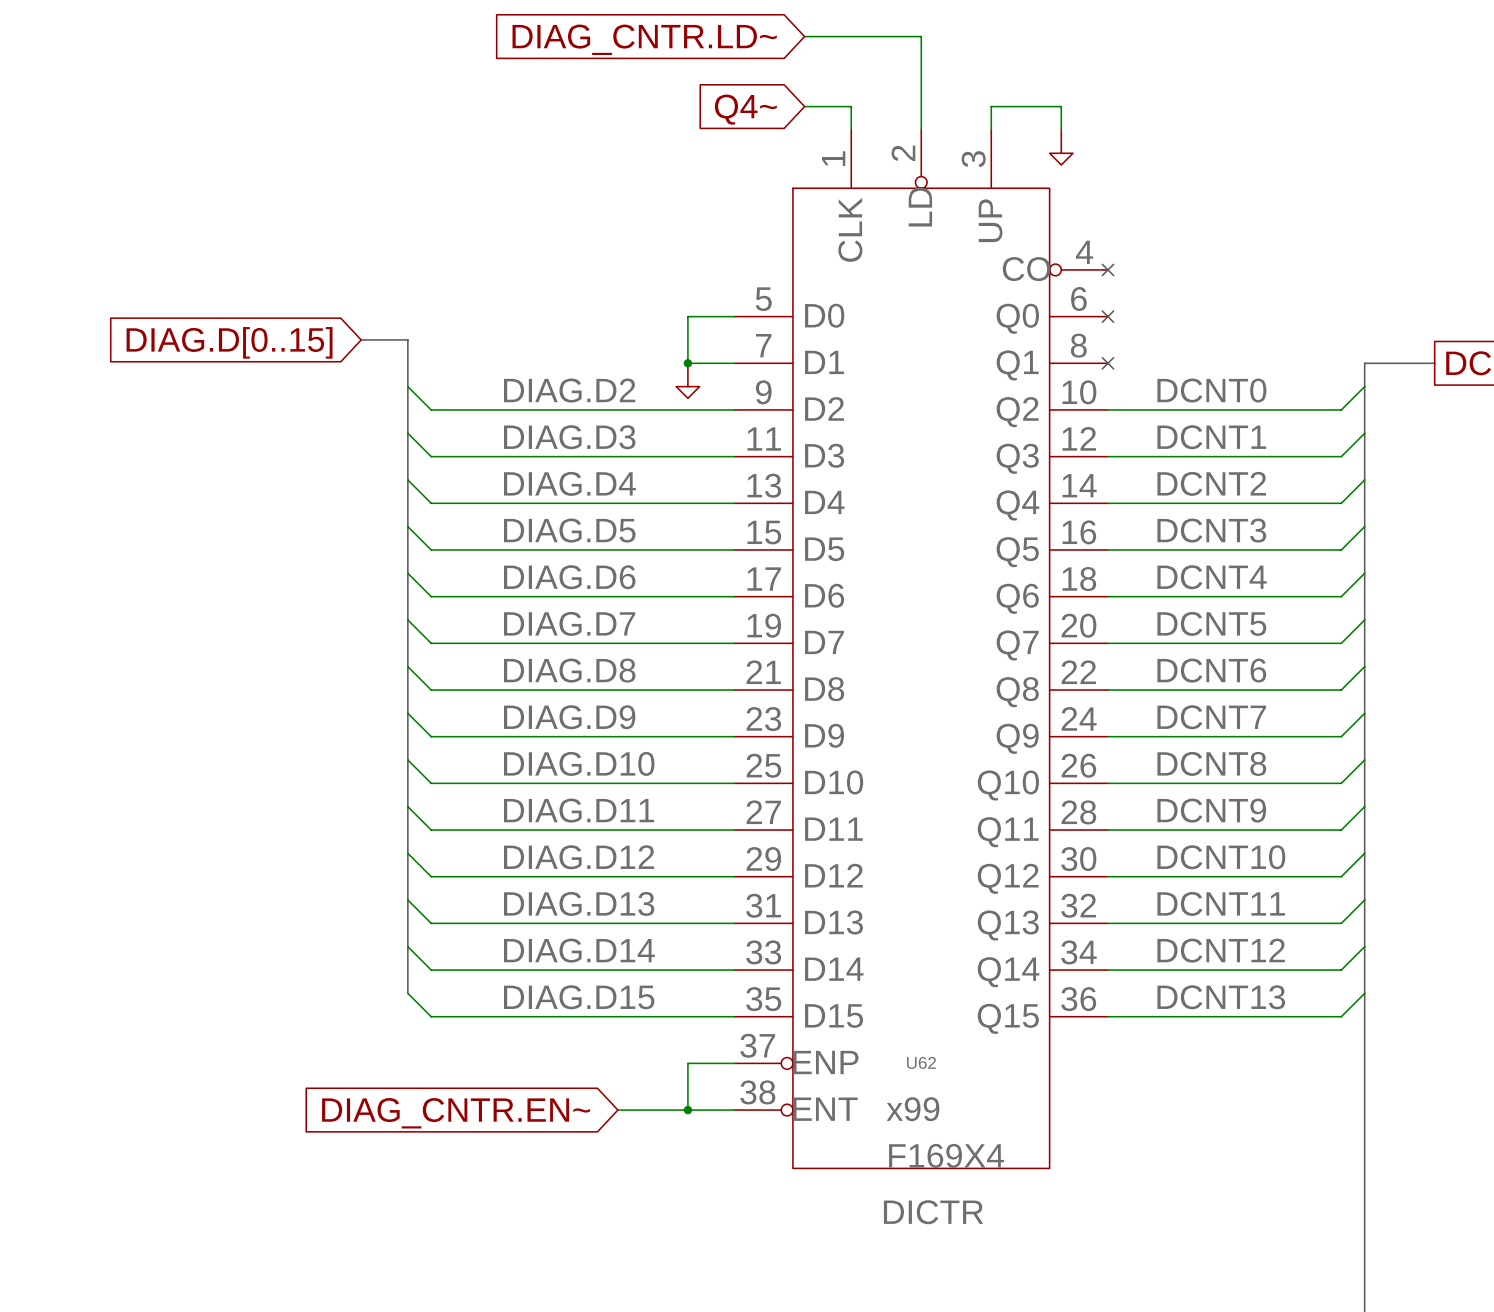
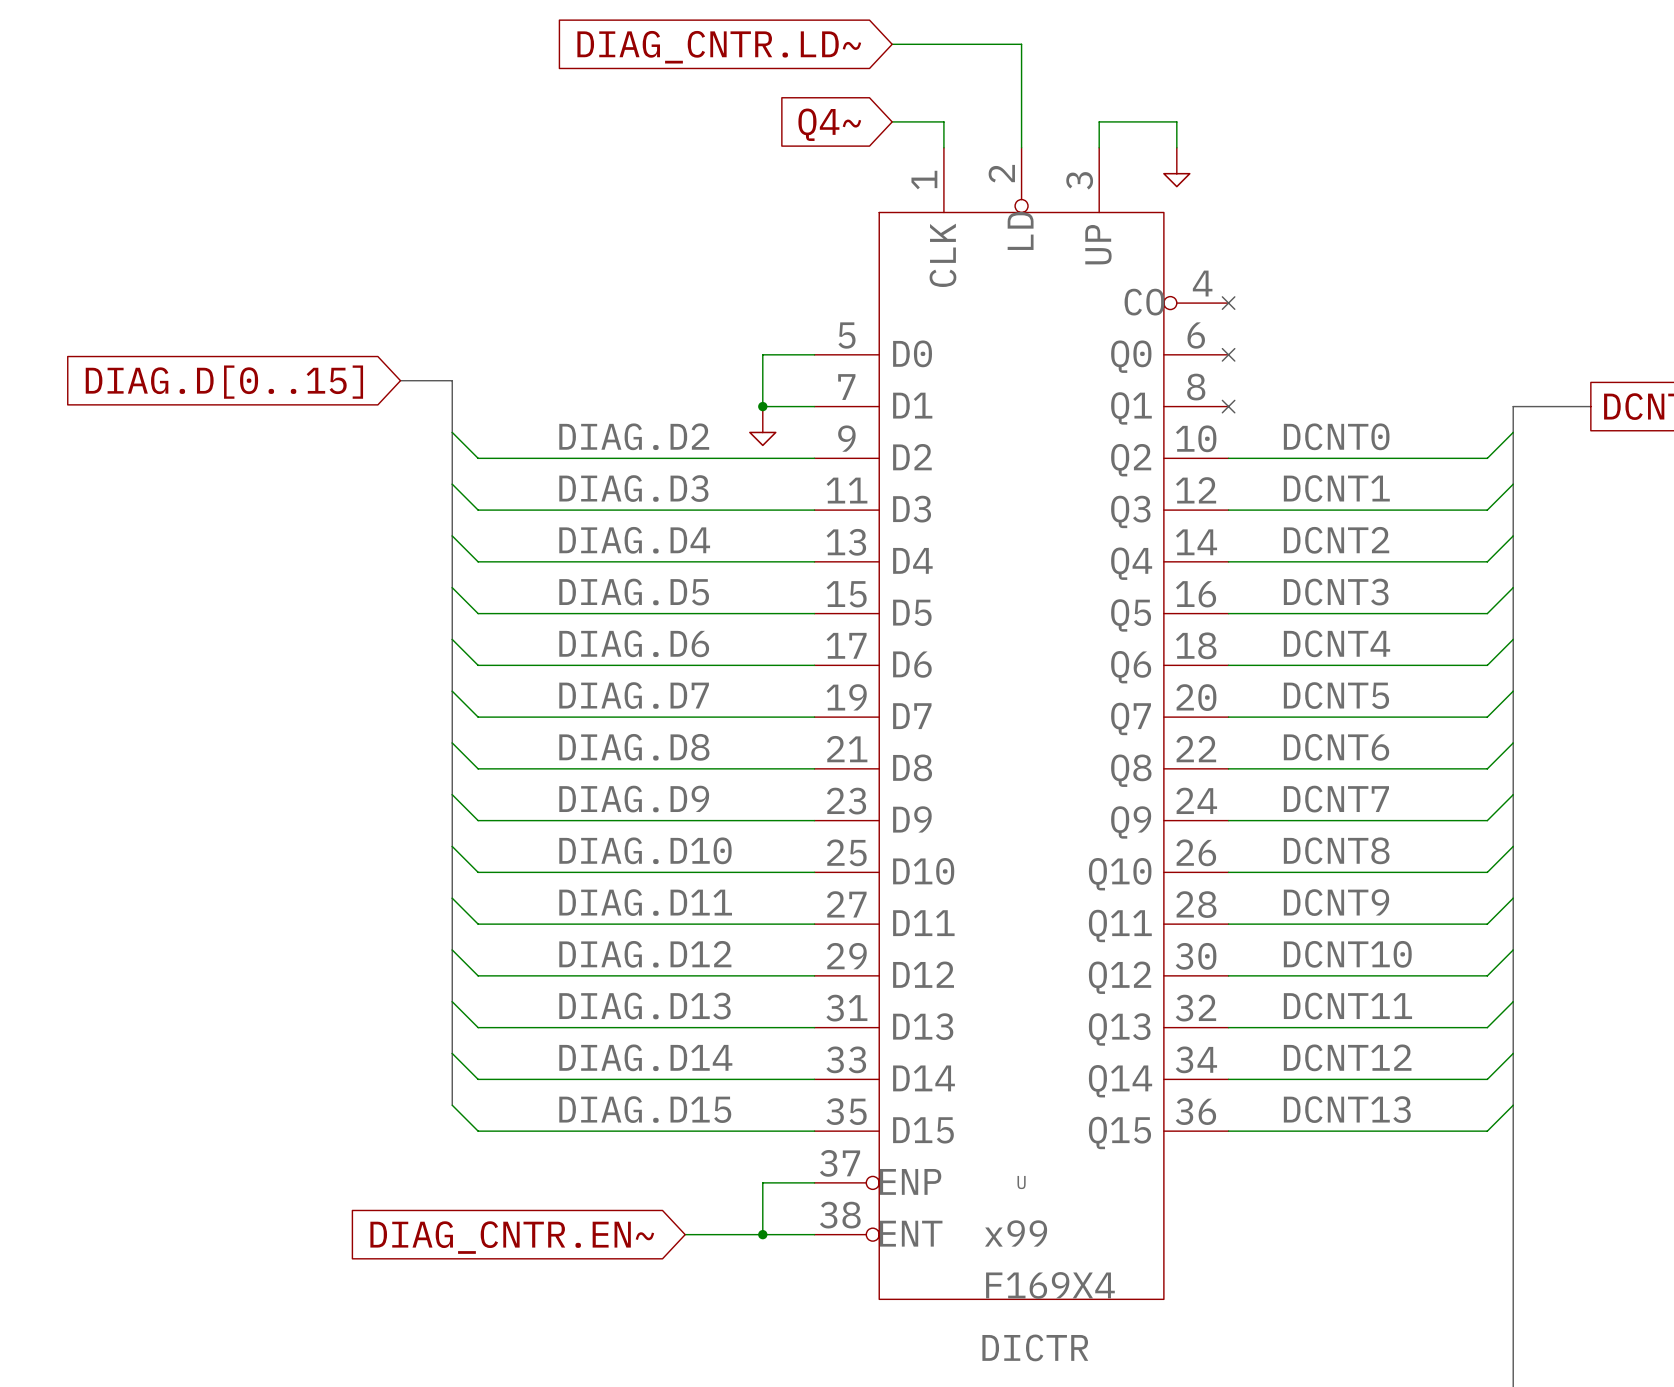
U62 name: U62 (921, 1062) -> U (1021, 1182)

